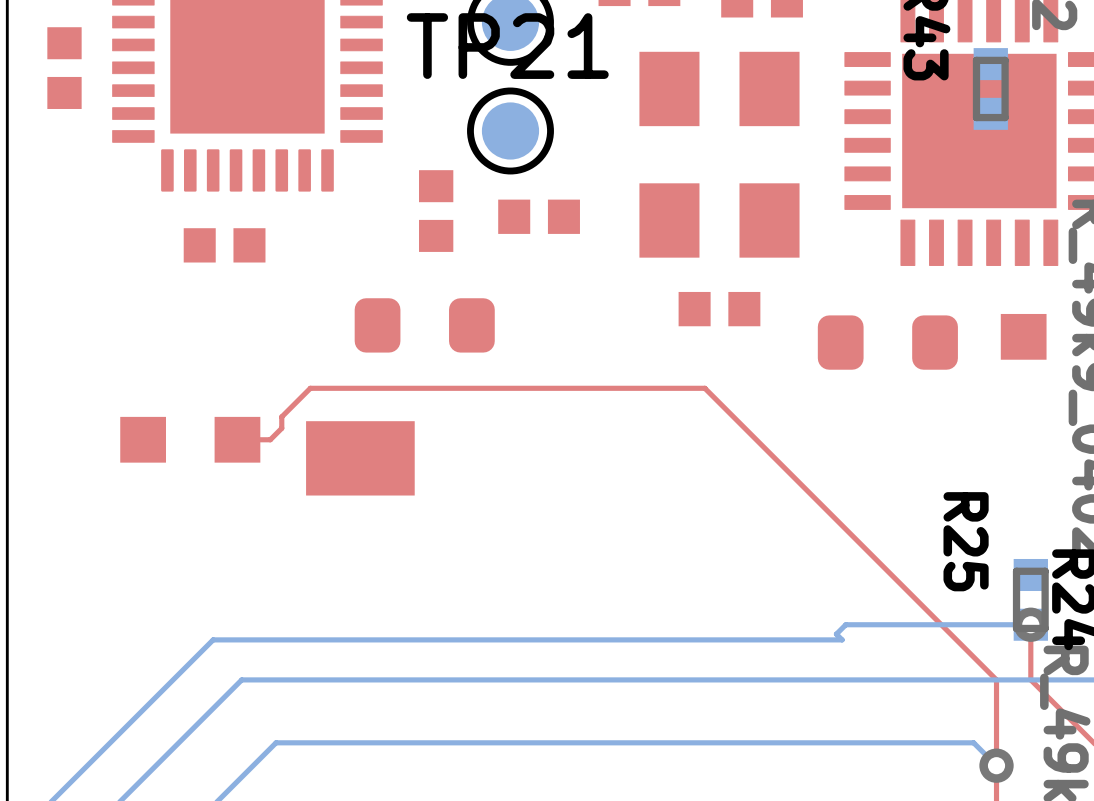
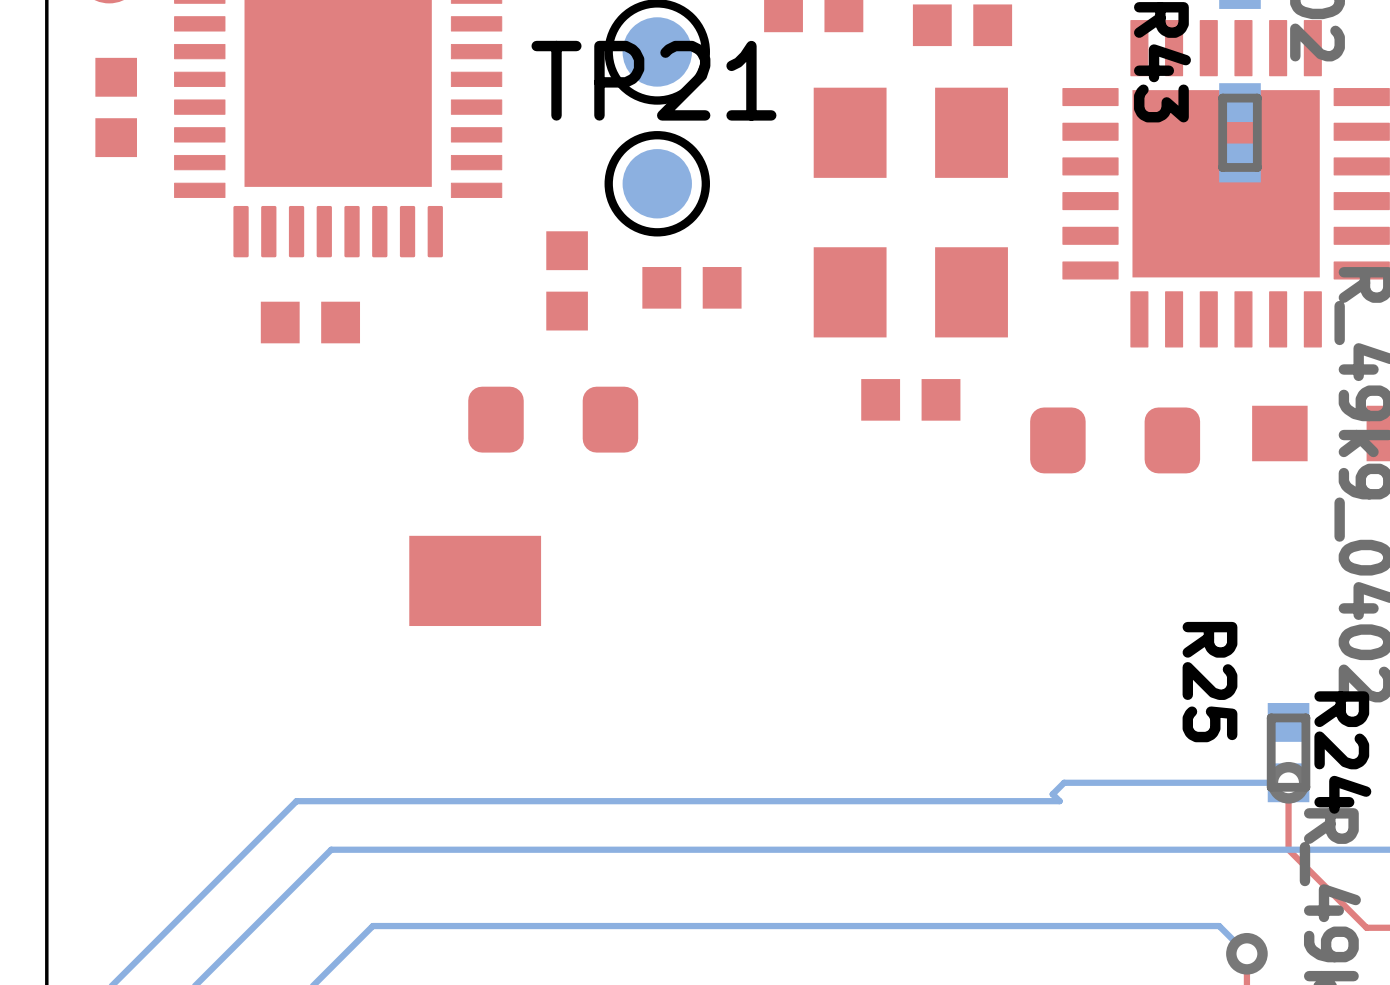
part: (190, 439) -> none
top track: (237, 439) (270, 439) (281, 428) (281, 416) (310, 388) (704, 388) (996, 679) (996, 765) -> none

